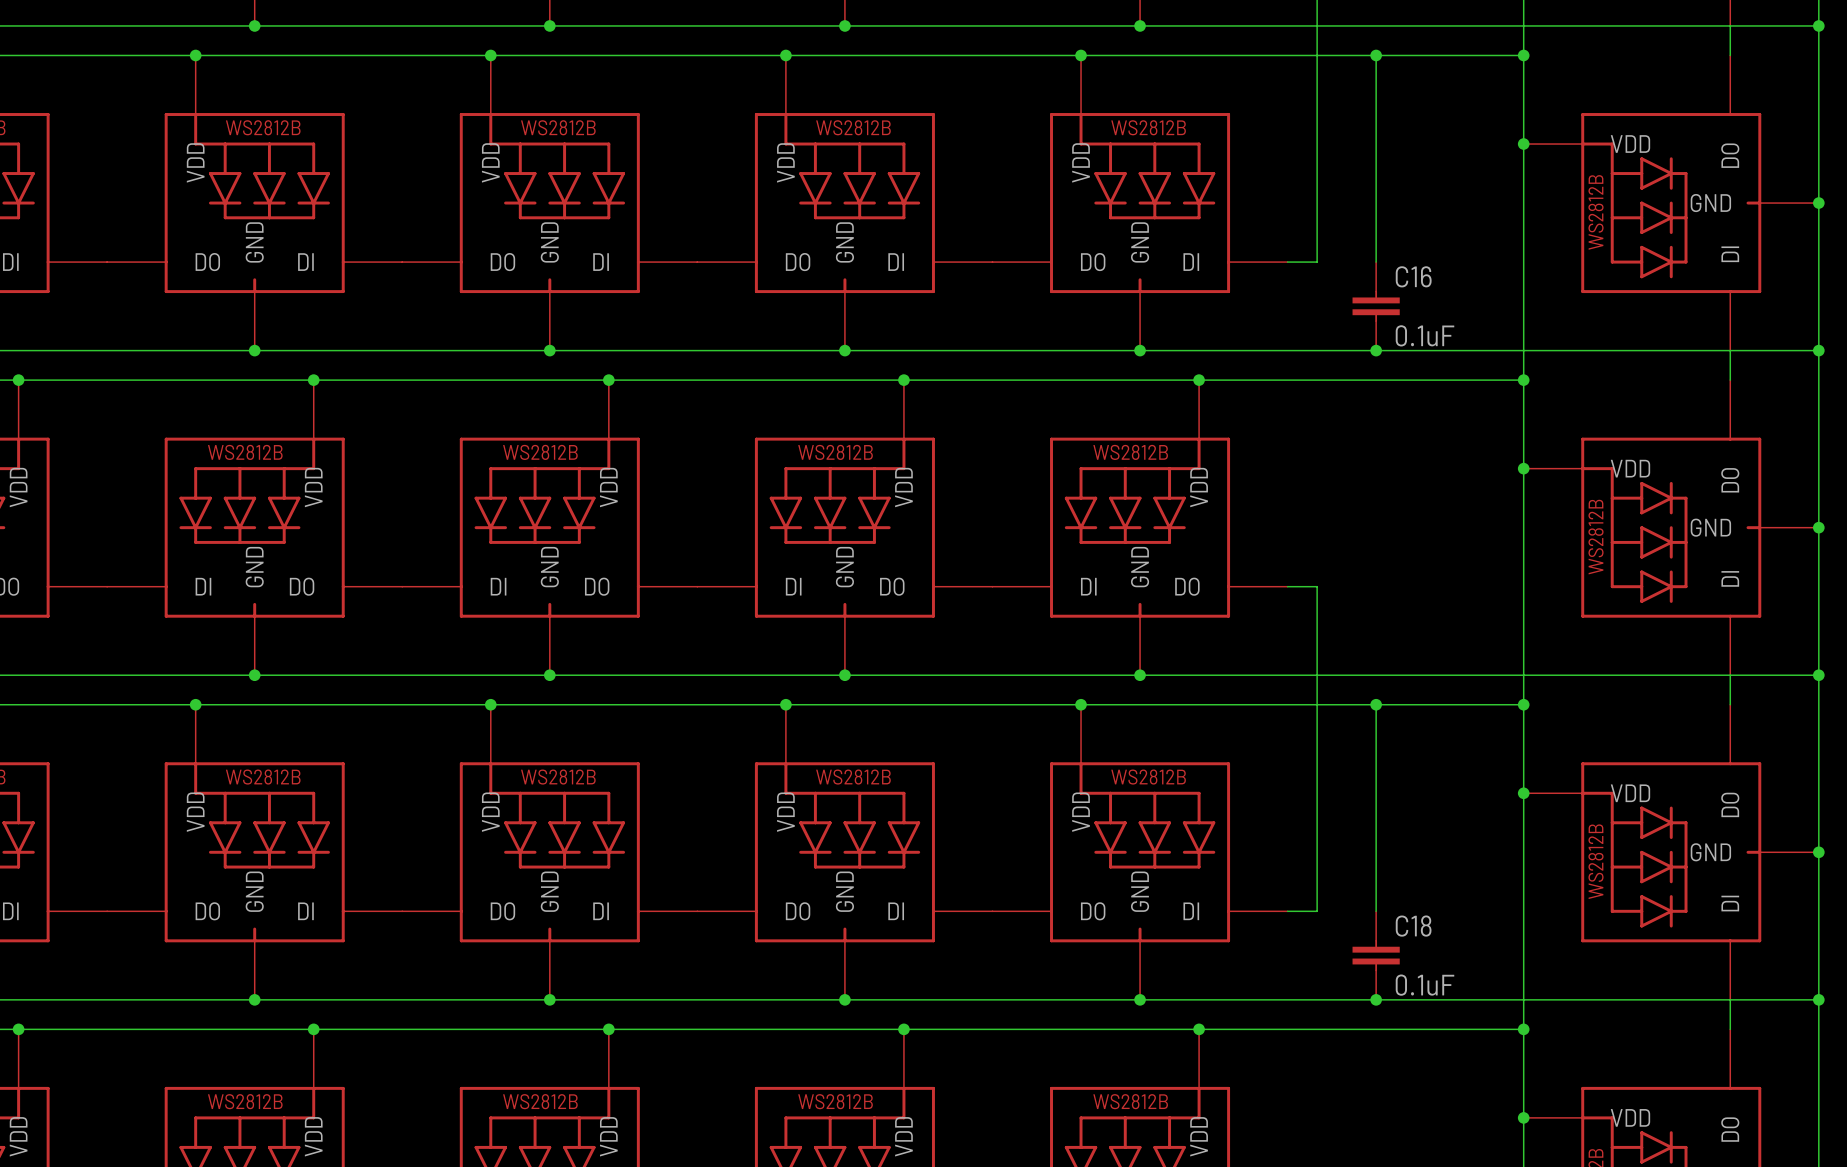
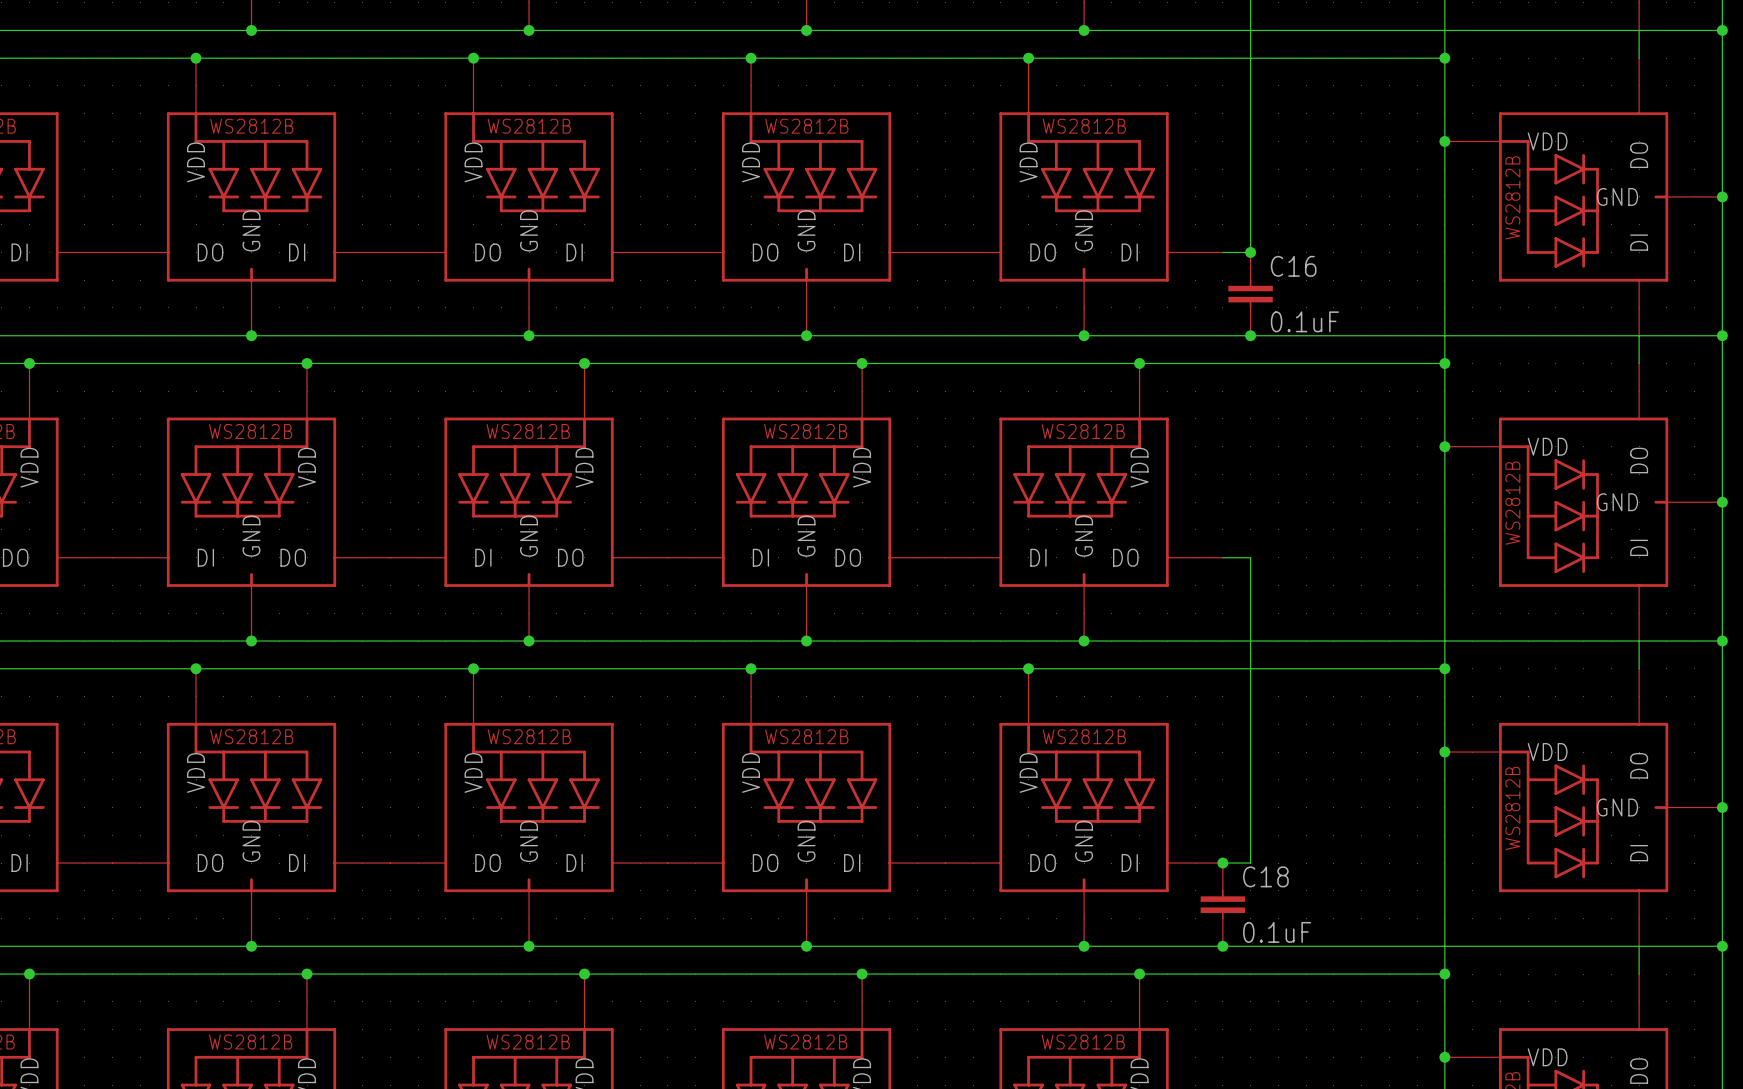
wire: (1376, 55) (1376, 262) -> none
junction: (1376, 55) -> none
junction: none -> (1250, 252)
C16 position: (1376, 306) -> (1250, 294)
junction: none -> (1250, 335)
junction: (1376, 350) -> none
wire: (1376, 704) (1376, 911) -> none
junction: (1376, 704) -> none
junction: none -> (1222, 863)
C18 position: (1376, 955) -> (1222, 904)
junction: none -> (1222, 946)
junction: (1376, 999) -> none

